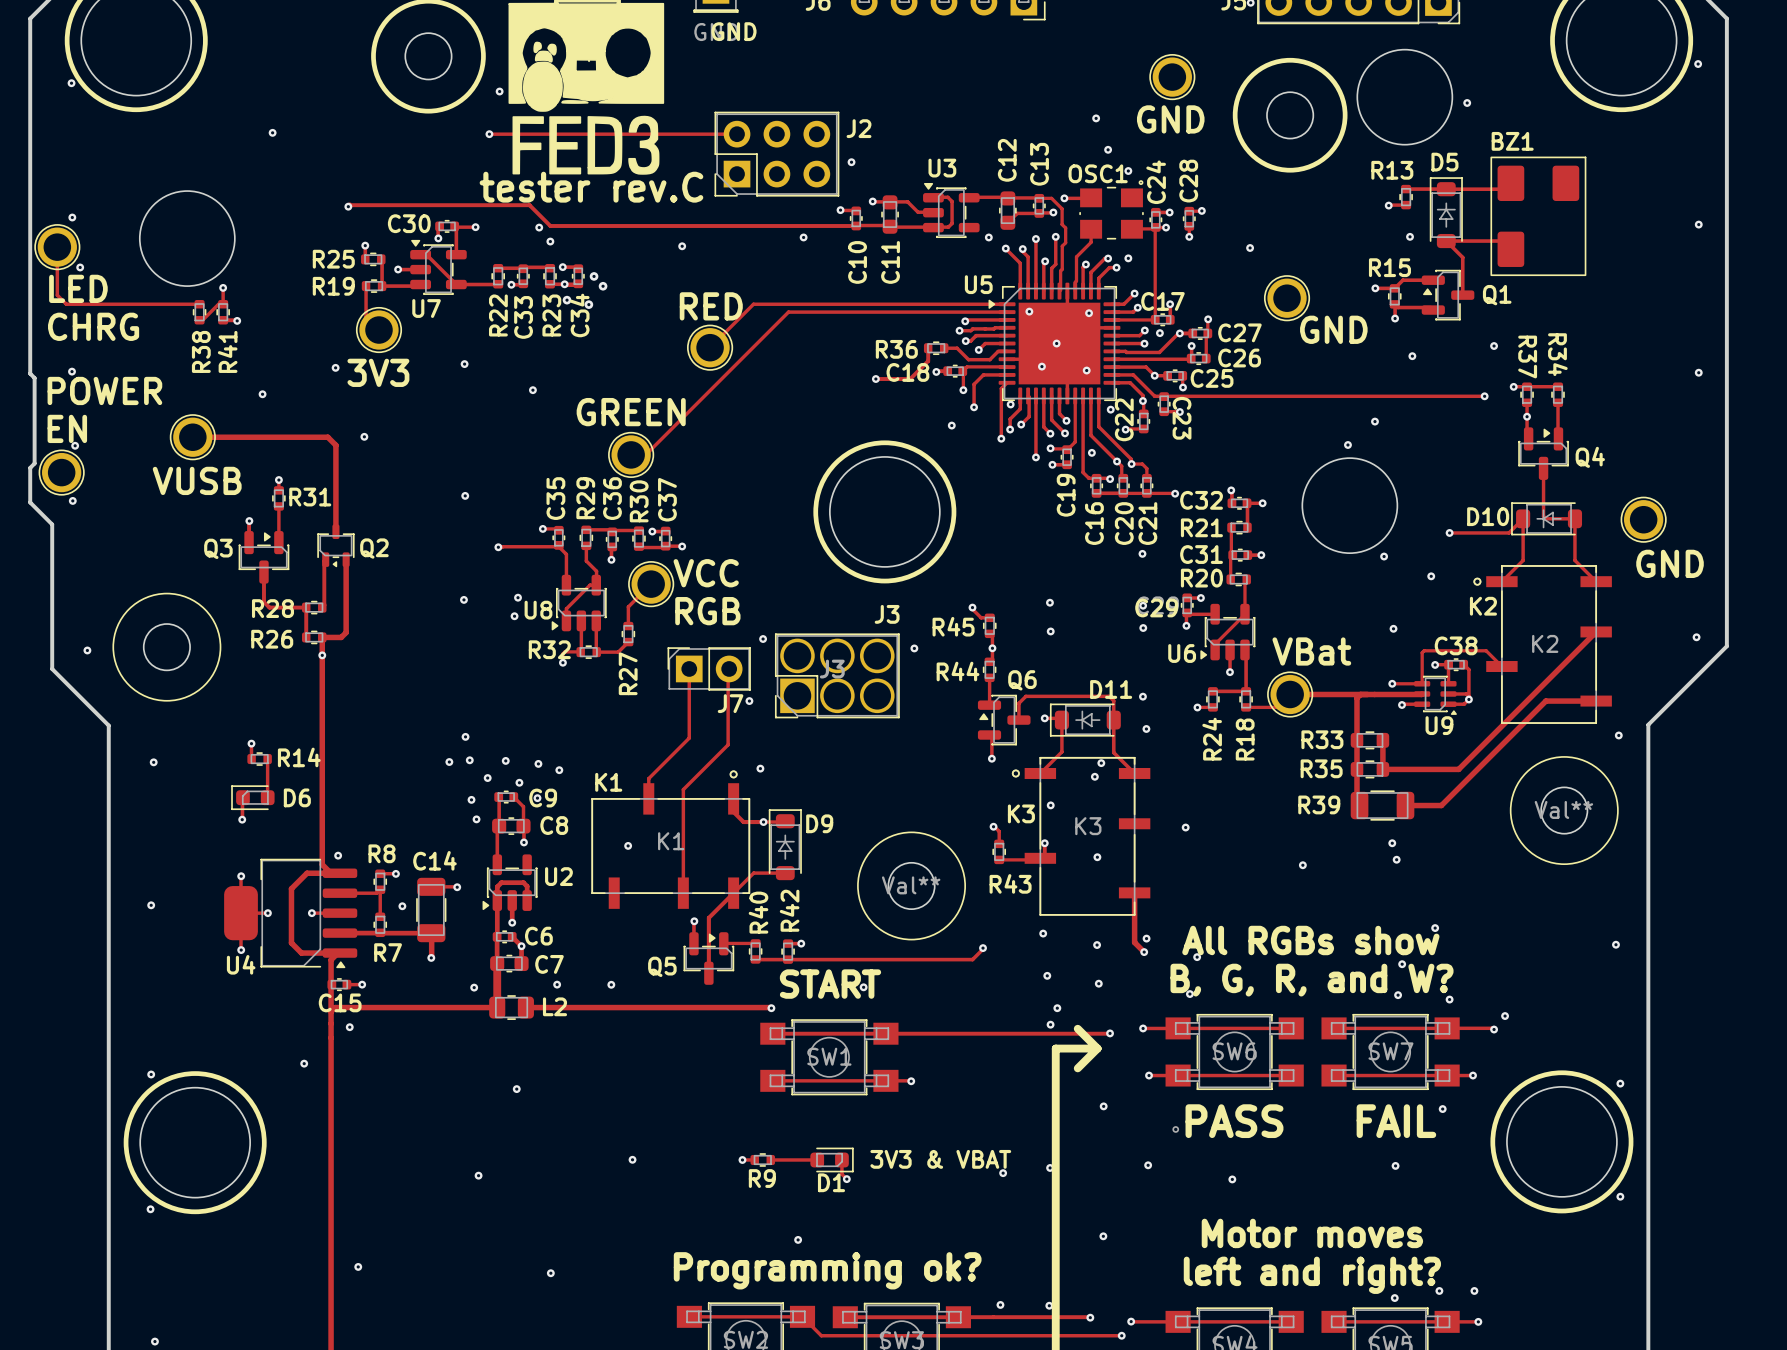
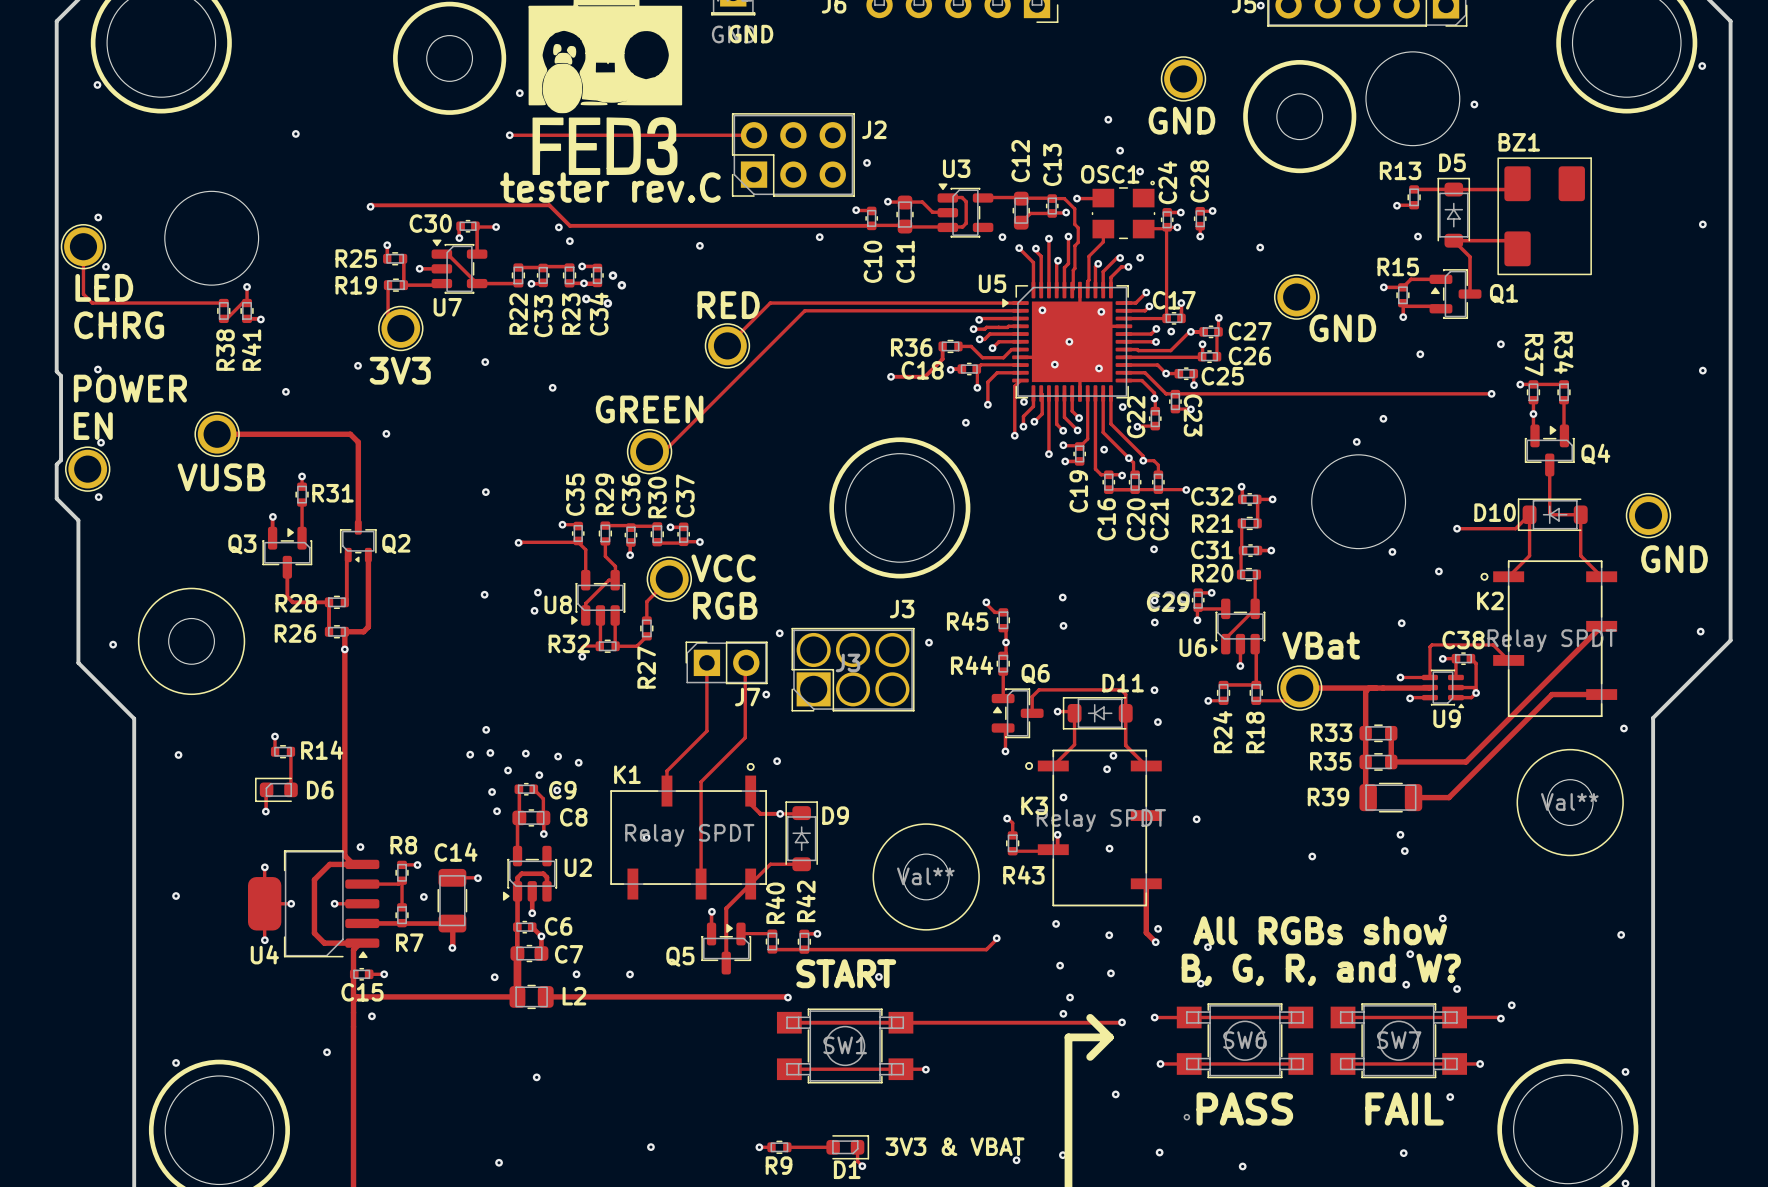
K2 value: K2 (1545, 643) -> Relay SPDT (1552, 640)
K3 value: K3 (1088, 826) -> Relay SPDT (1101, 820)
K1 value: K1 (671, 841) -> Relay SPDT (689, 835)

